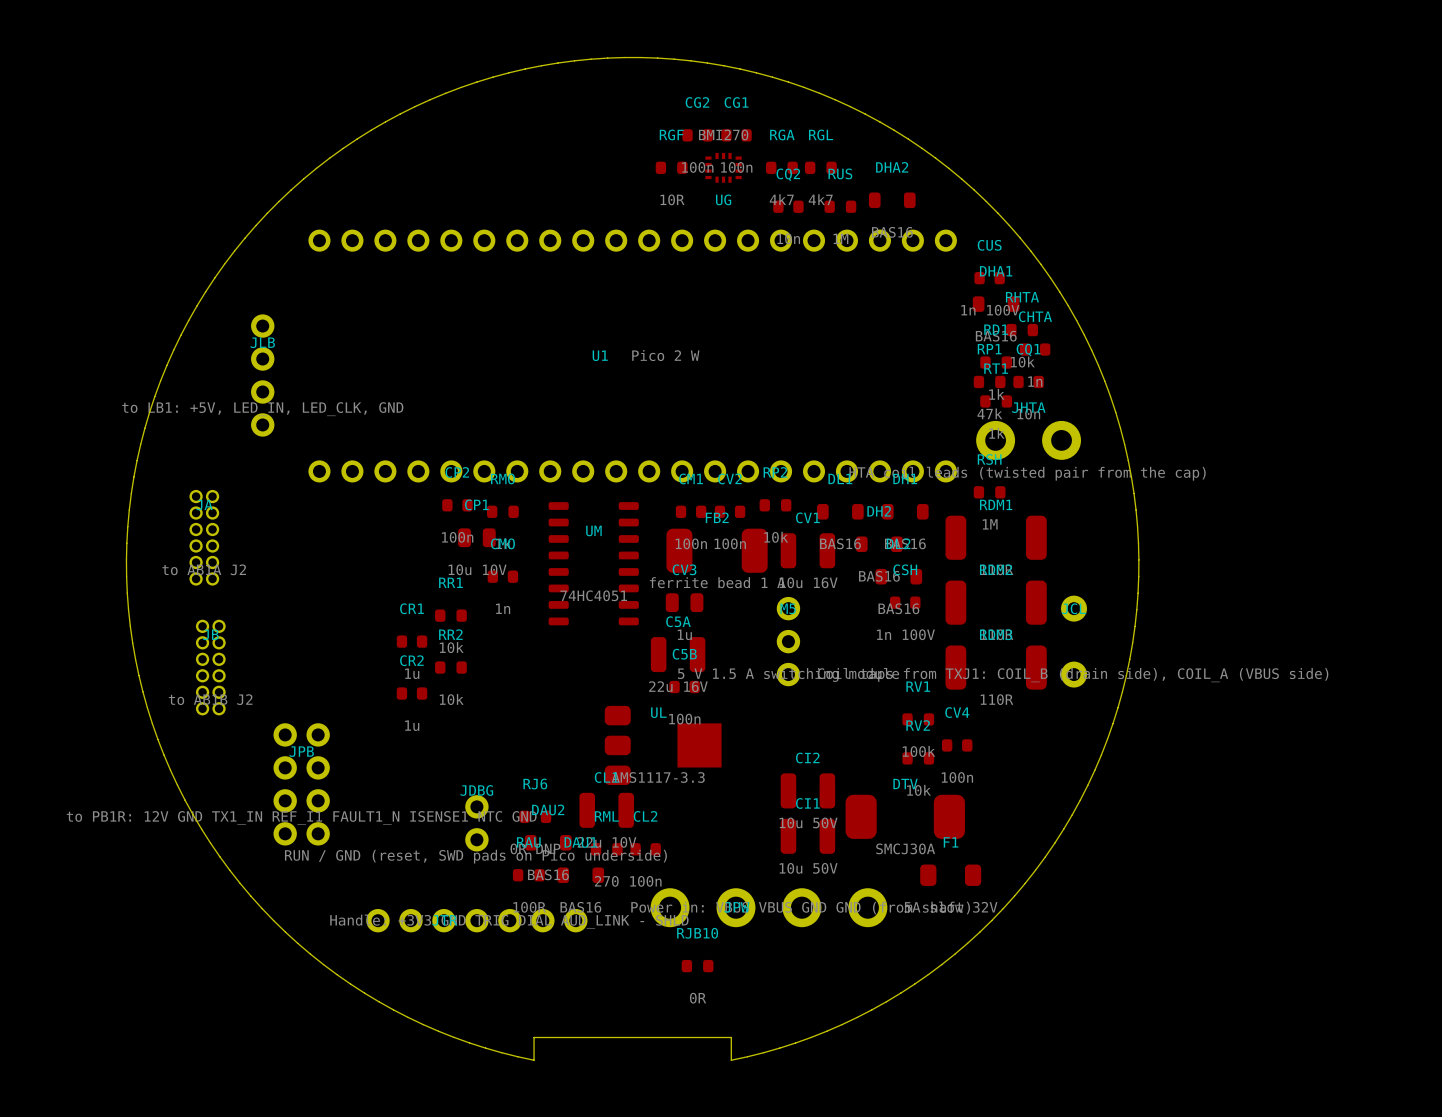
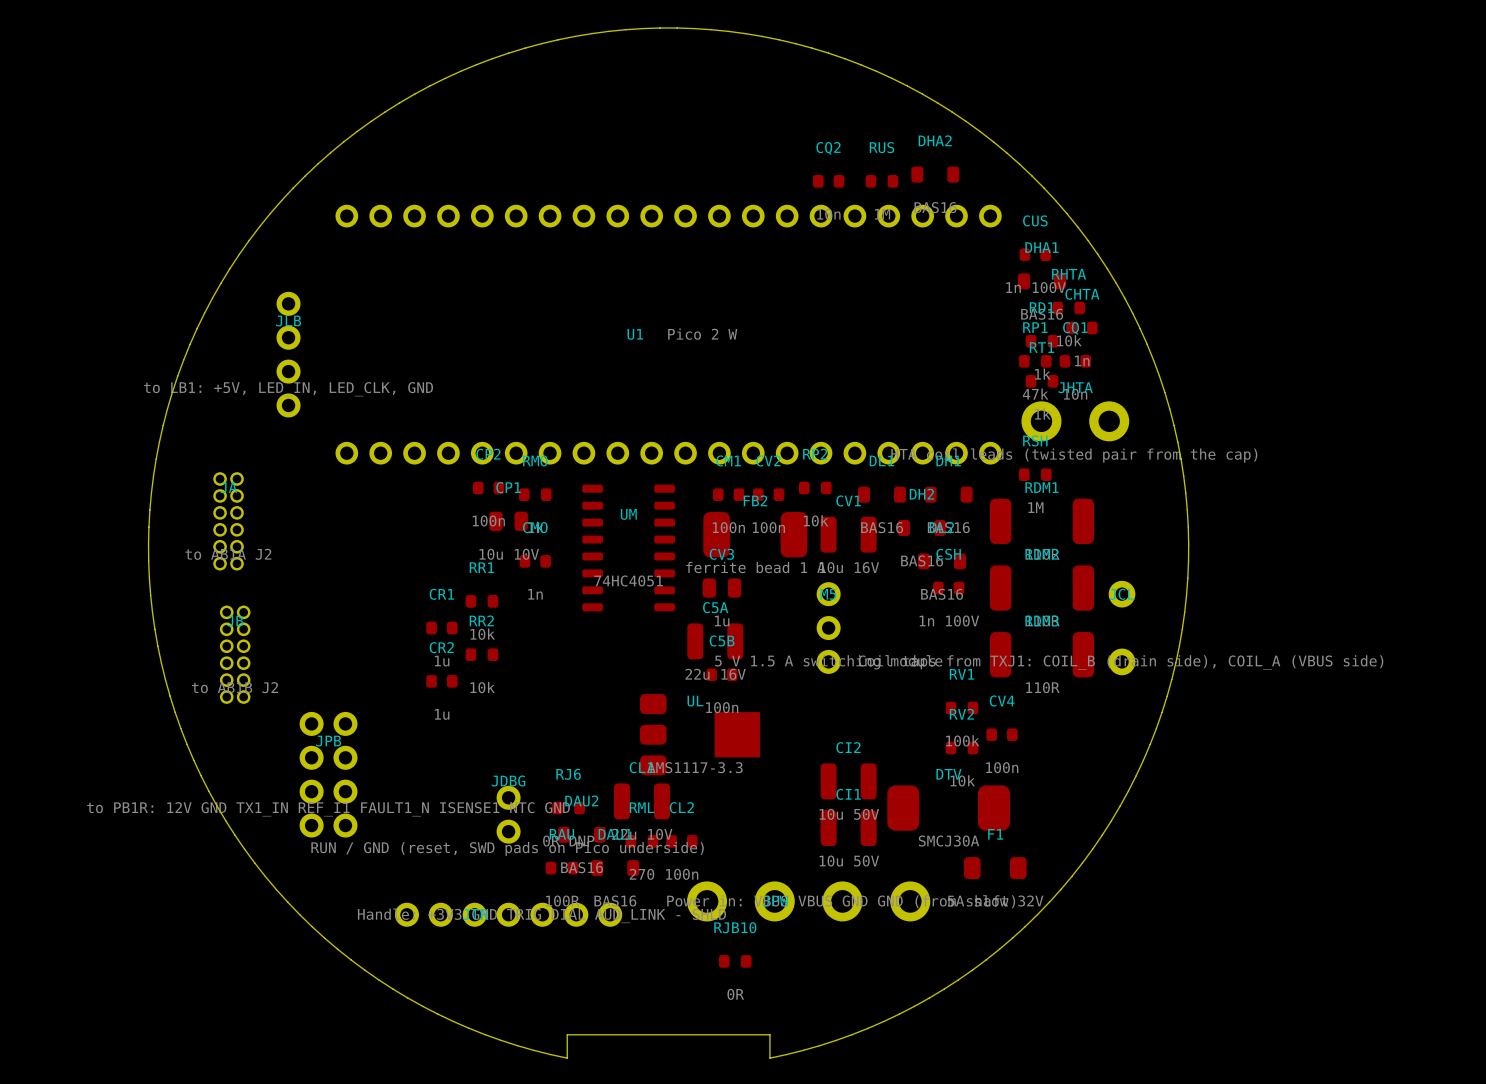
CG2: 100n (697, 135) -> none
CG1: 100n (736, 135) -> none
RGF: 10R (671, 167) -> none
UG: BMI270 (723, 167) -> none
RGA: 4k7 (781, 167) -> none
RGL: 4k7 (820, 167) -> none

